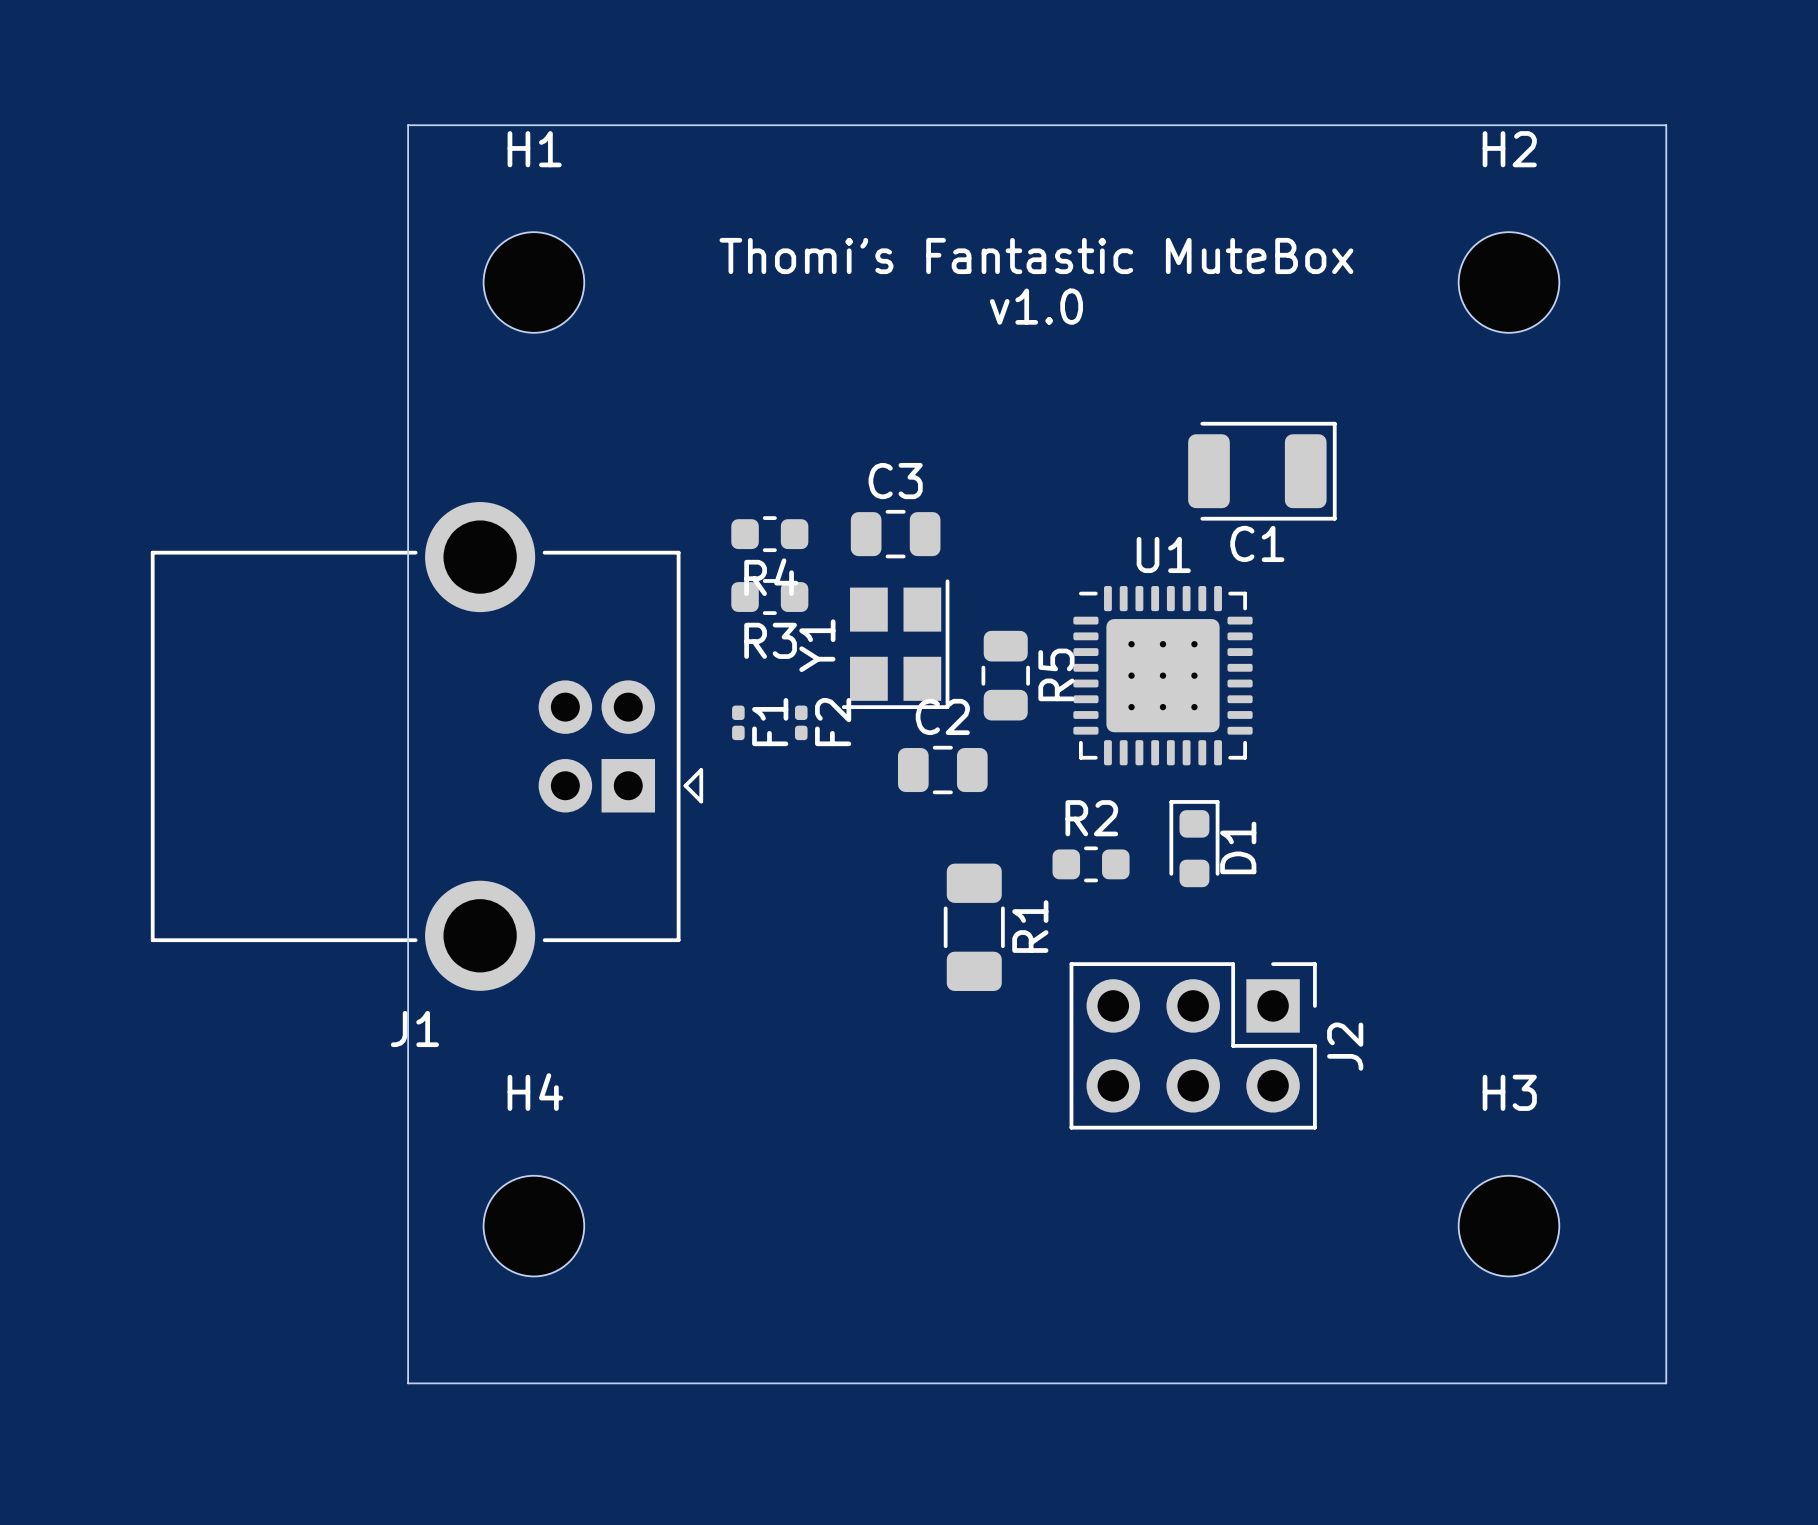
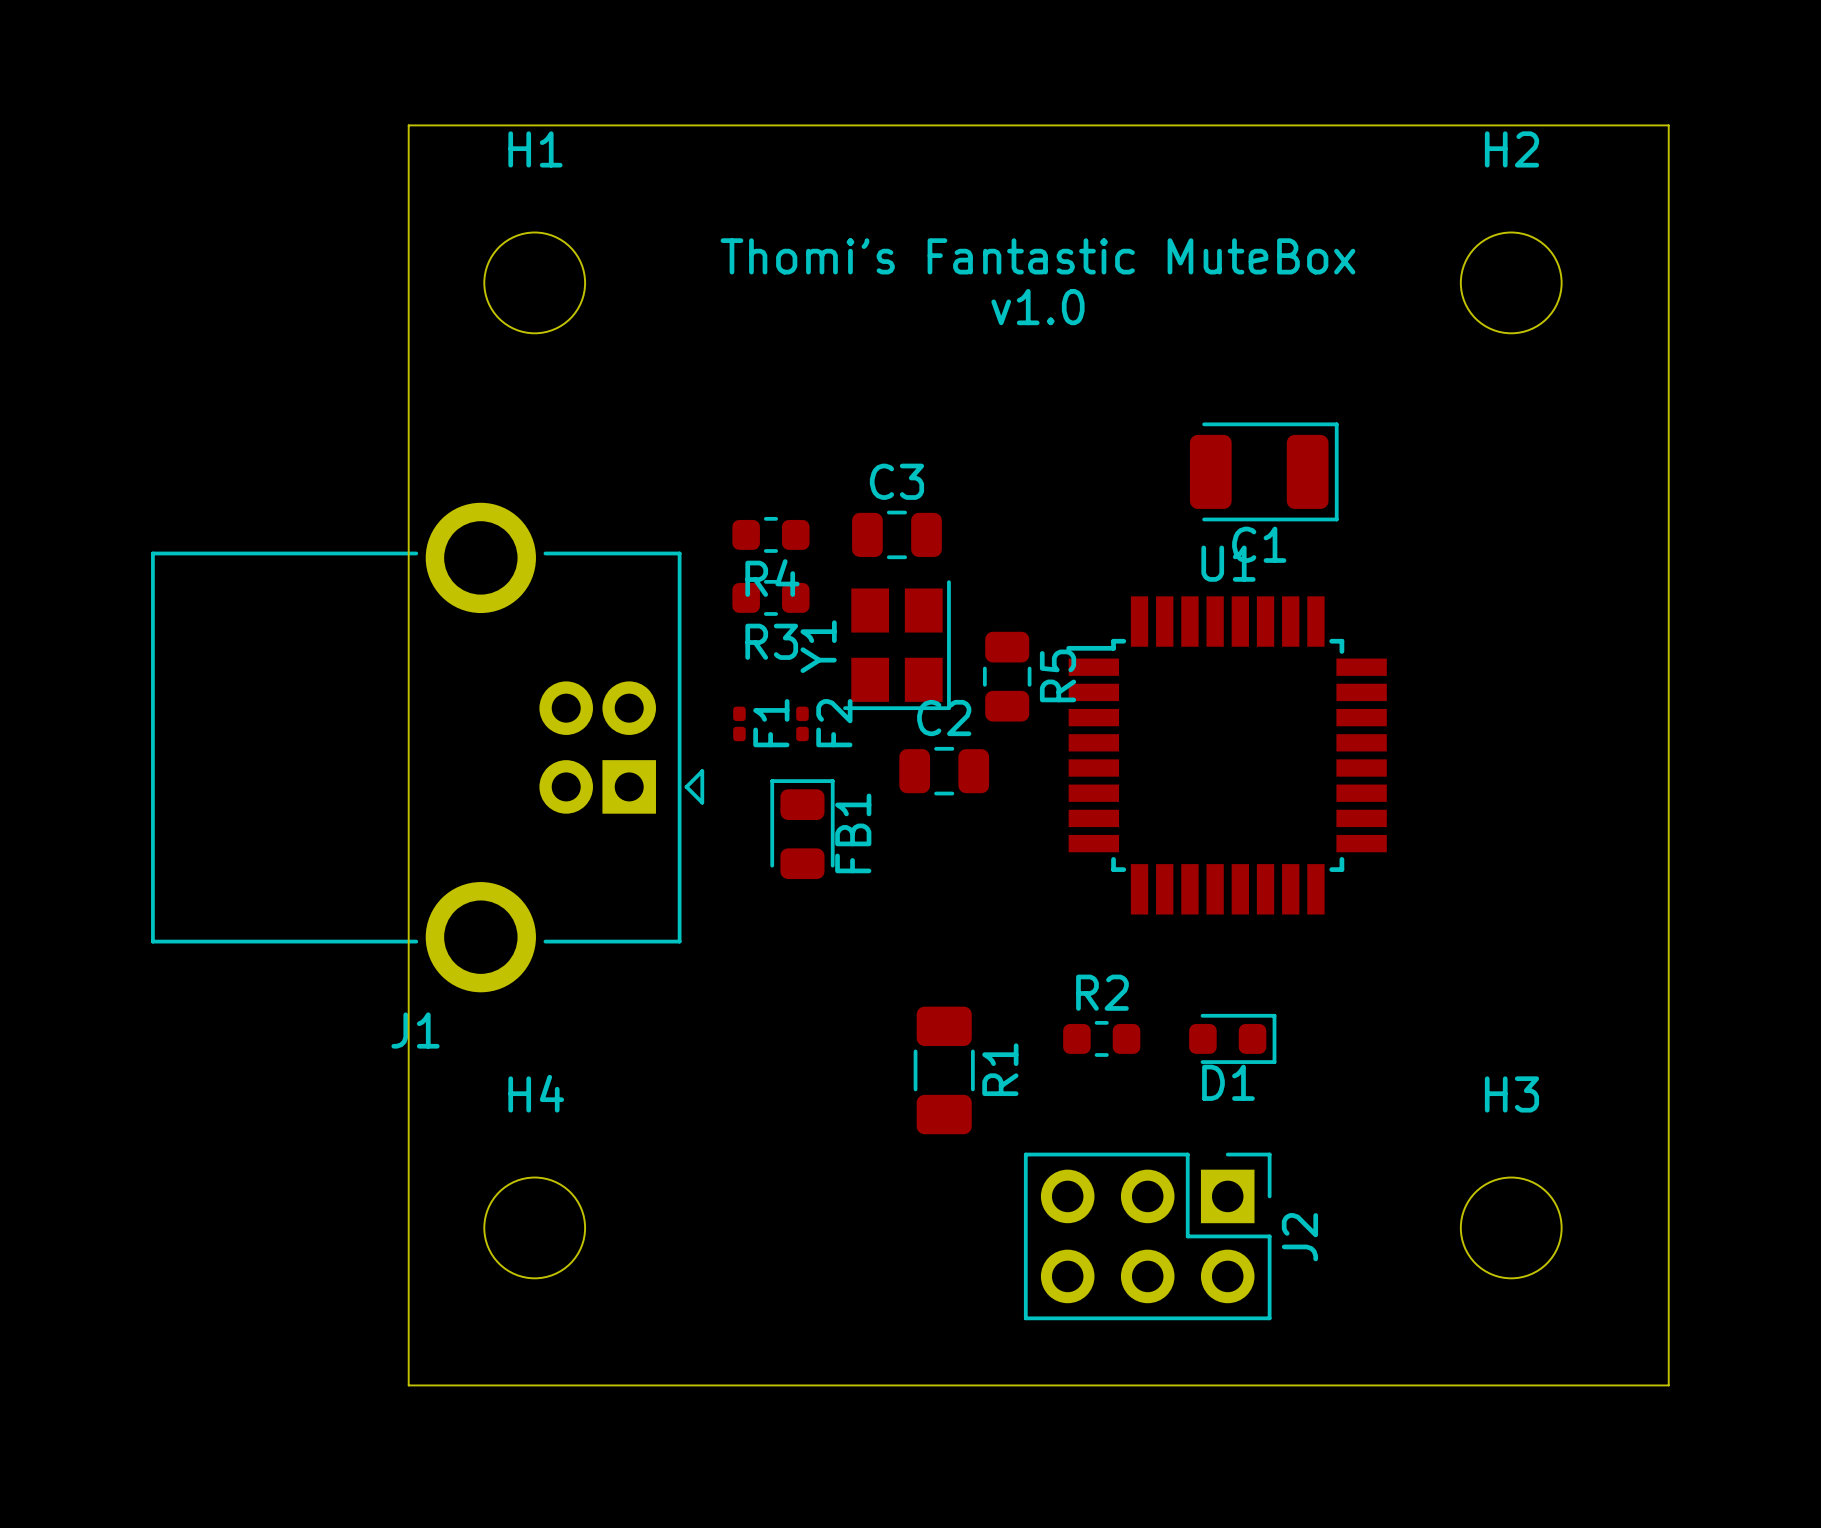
U1 name position: U1 (1163, 554) -> U1 (1228, 563)
U1 footprint: [1073, 586, 1253, 766] -> [1066, 596, 1387, 915]
FB1: none -> (802, 829)
D1 rotation: 0° (1194, 843) -> 90° clockwise (1232, 1038)
D1 position: (1194, 843) -> (1232, 1038)
R2 position: (1091, 864) -> (1101, 1038)
R1 position: (974, 927) -> (944, 1070)
J2 position: (1193, 1045) -> (1147, 1236)

